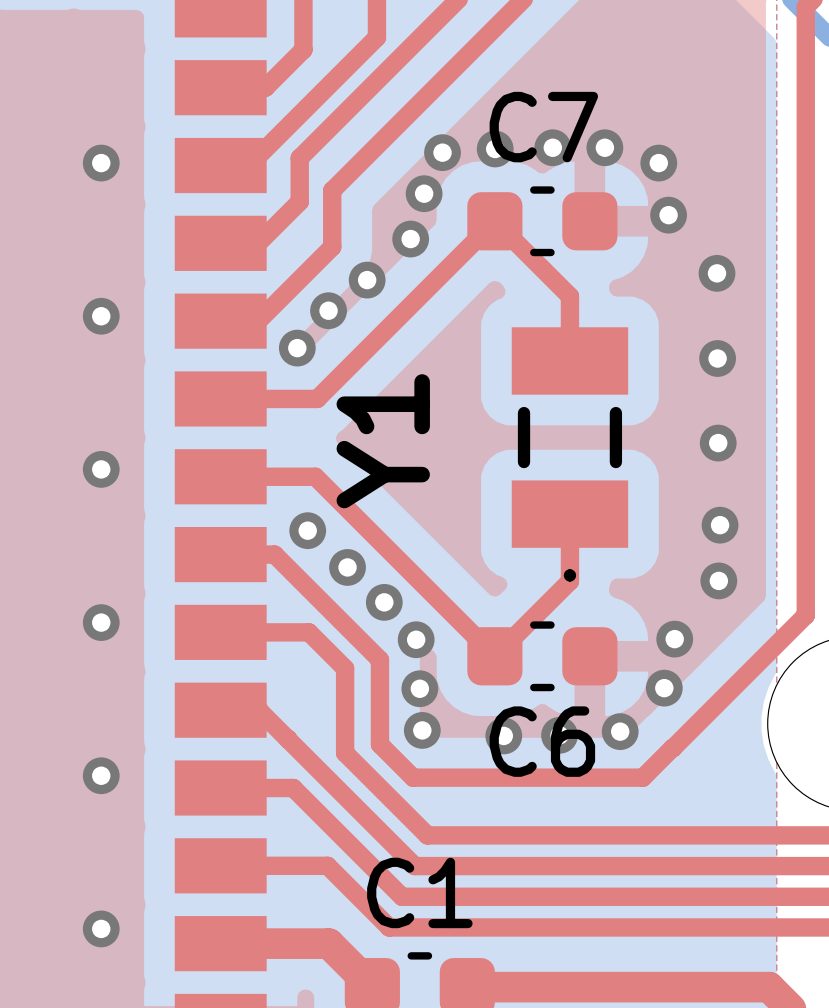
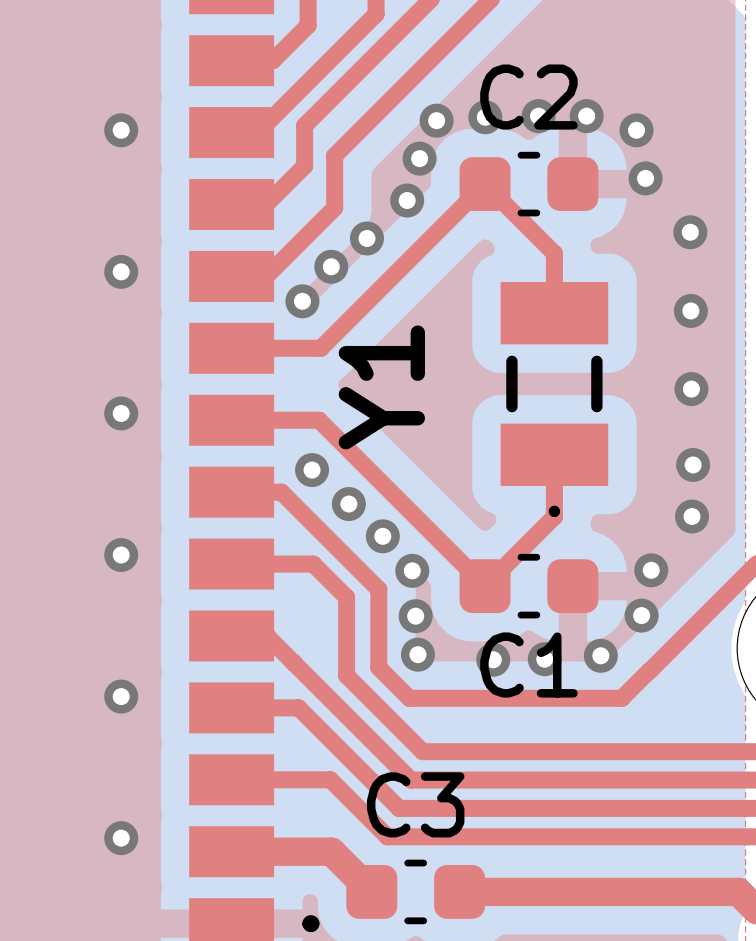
C7 name: C7 (543, 127) -> C2 (528, 97)
C6 name: C6 (542, 741) -> C1 (528, 665)
C1 name: C1 (419, 892) -> C3 (415, 804)

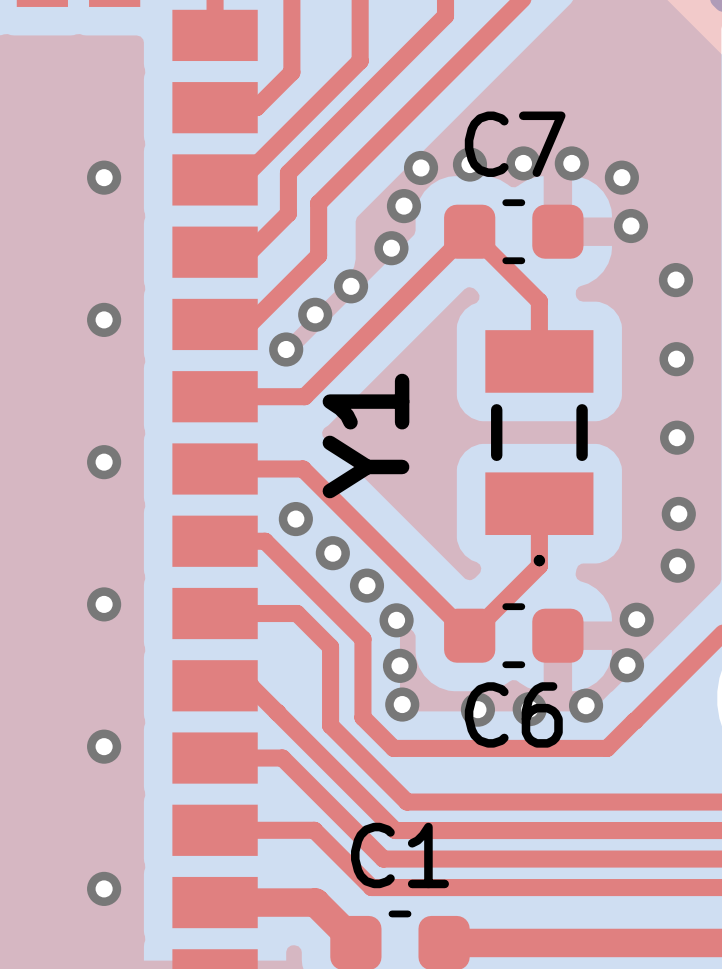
C2 name: C2 (528, 97) -> C7 (515, 144)
C1 name: C1 (528, 665) -> C6 (513, 714)
C3 name: C3 (415, 804) -> C1 (399, 855)

